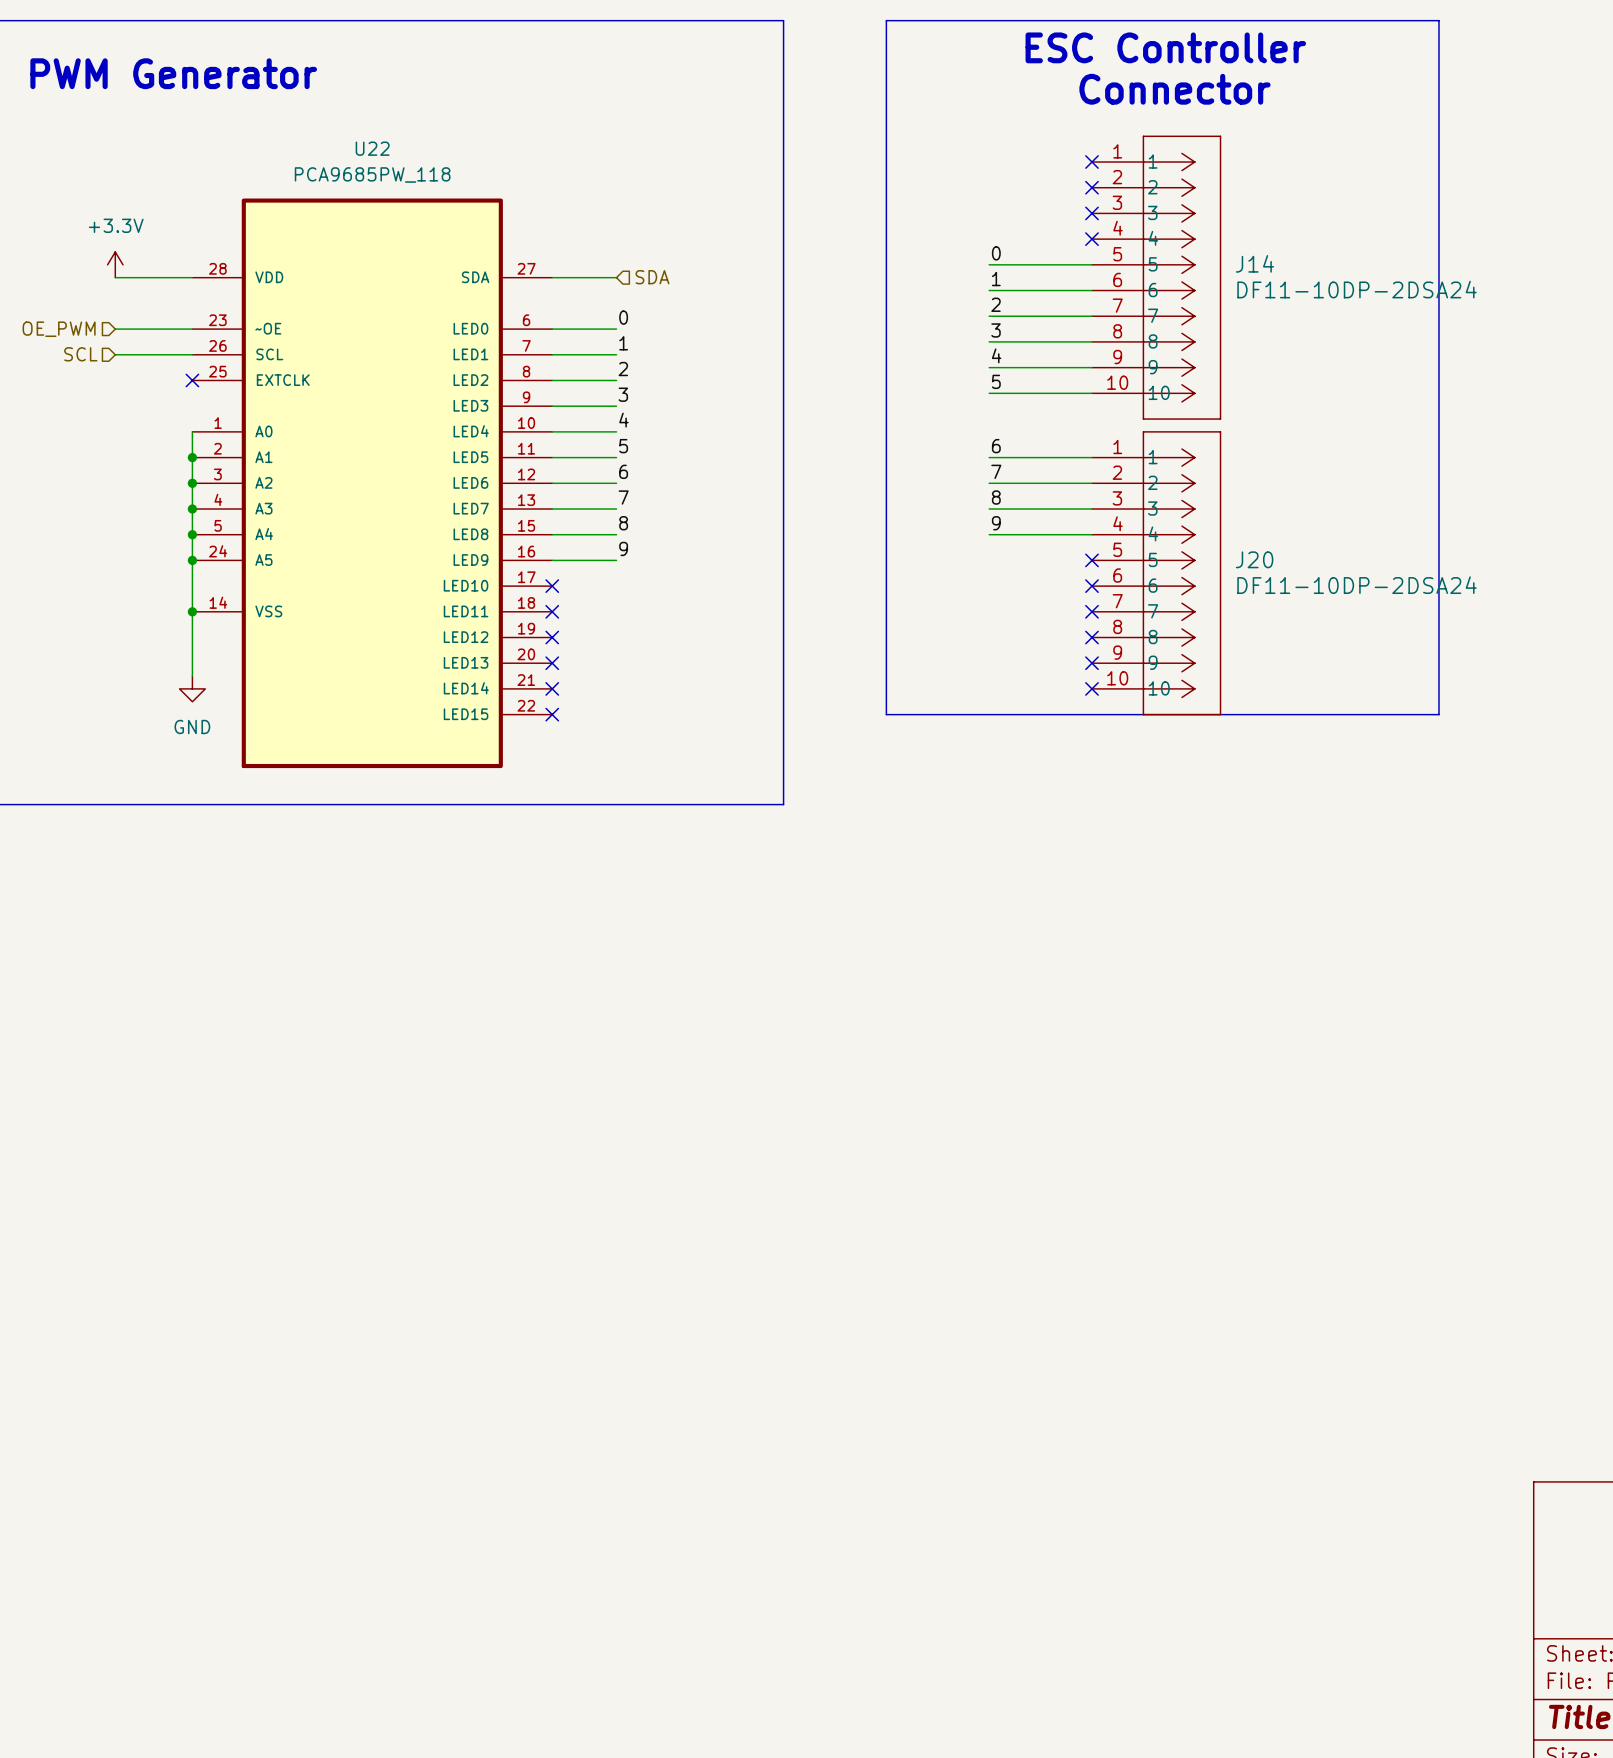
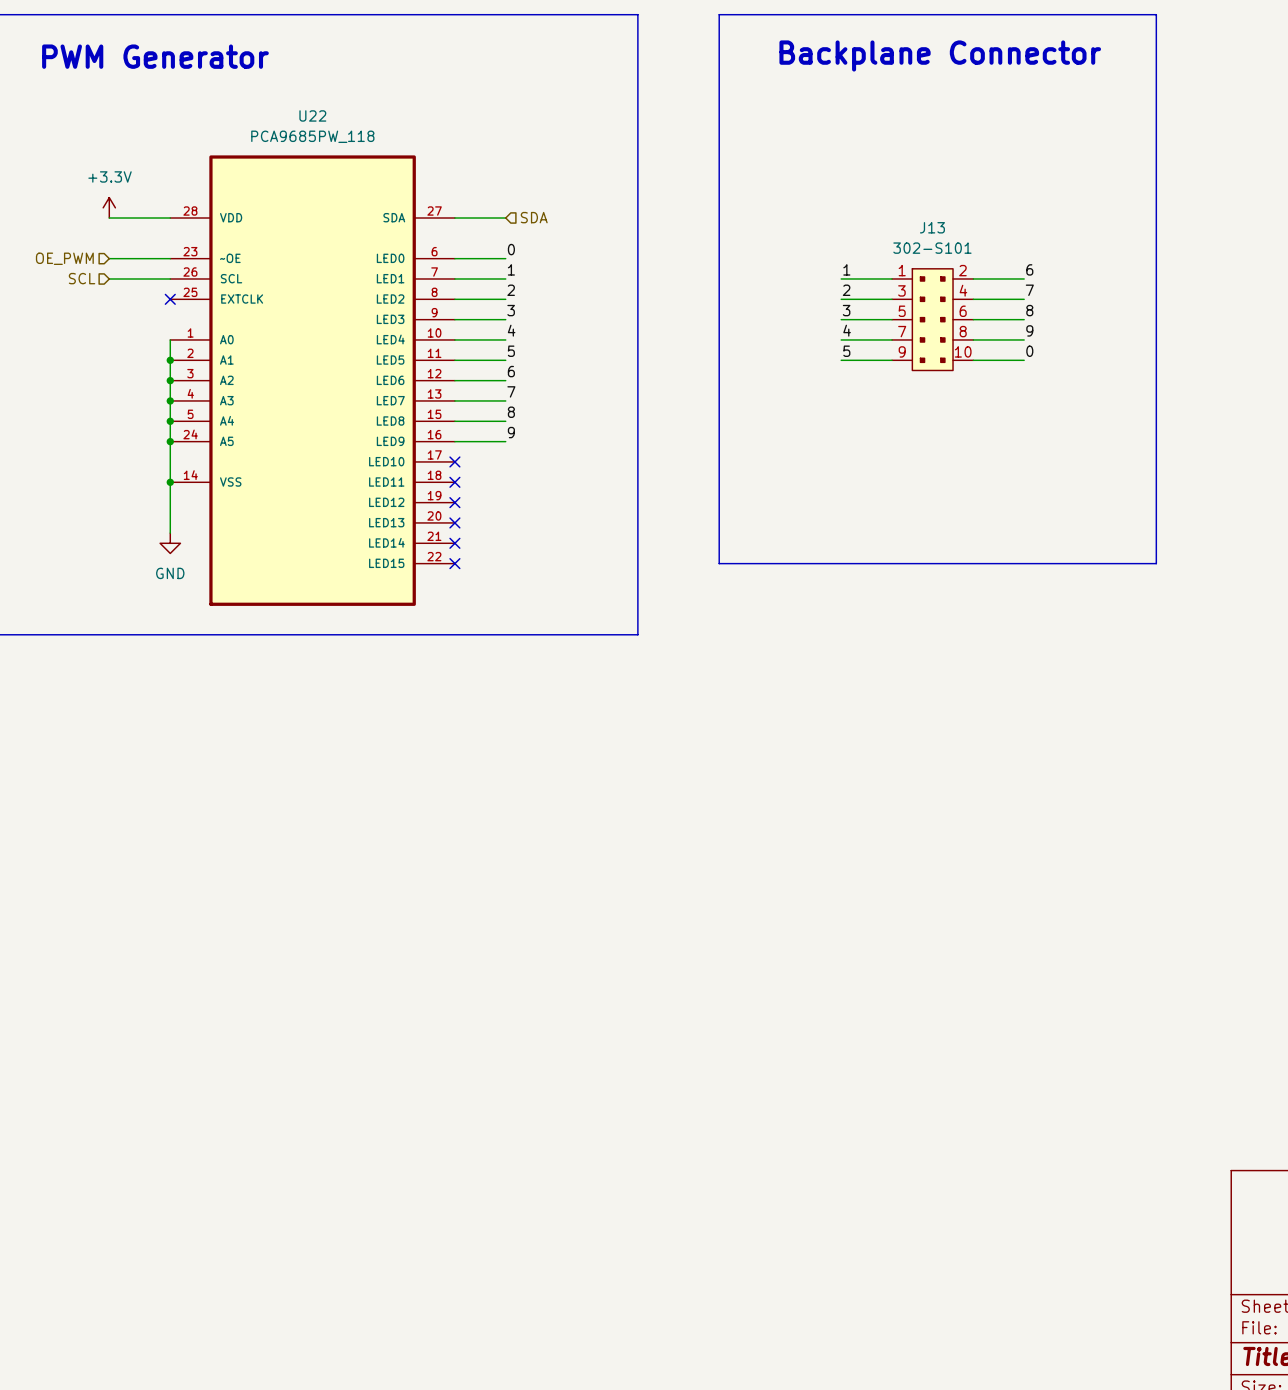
text: ESC Controller (1165, 47) -> none
text: Connector (1174, 89) -> Backplane Connector (940, 55)
no-connect mark: (1092, 162) -> none
no-connect mark: (1092, 187) -> none
no-connect mark: (1092, 213) -> none
no-connect mark: (1092, 239) -> none
label: 0 (996, 253) -> none
wire: (989, 264) (1092, 264) -> none
J14: DF11-10DP-2DSA24 (1156, 277) -> none
label position: 1 (996, 279) -> 1 (846, 269)
wire: (989, 290) (1092, 290) -> none
label position: 2 (996, 304) -> 2 (846, 290)
wire: (989, 316) (1092, 316) -> none
label position: 3 (996, 330) -> 3 (846, 310)
wire: (989, 341) (1092, 341) -> none
label: none -> 6 (1029, 269)
wire: none -> (841, 278) (892, 278)
wire: none -> (973, 278) (1024, 278)
label position: 4 (996, 355) -> 4 (847, 330)
wire: (989, 367) (1092, 367) -> none
label: none -> 7 (1029, 290)
wire: none -> (841, 299) (892, 299)
wire: none -> (973, 299) (1024, 299)
label position: 5 (996, 381) -> 5 (846, 351)
wire: (989, 393) (1092, 393) -> none
label: none -> 8 (1029, 310)
wire: none -> (841, 319) (892, 319)
J13: none -> 302-S101 (932, 319)
wire: none -> (973, 319) (1024, 319)
label: none -> 9 (1029, 330)
wire: none -> (841, 339) (892, 339)
wire: none -> (973, 339) (1024, 339)
label: 6 (996, 446) -> none
label: none -> 0 (1029, 351)
wire: (989, 457) (1040, 457) -> none
wire: none -> (973, 360) (1024, 360)
label: 7 (996, 471) -> none
wire: (989, 483) (1092, 483) -> none
label: 8 (996, 497) -> none
wire: (989, 509) (1092, 509) -> none
label: 9 (996, 523) -> none
wire: (989, 534) (1092, 534) -> none
no-connect mark: (1092, 560) -> none
J20: DF11-10DP-2DSA24 (1156, 573) -> none
no-connect mark: (1092, 586) -> none
no-connect mark: (1092, 611) -> none
no-connect mark: (1092, 637) -> none
no-connect mark: (1092, 663) -> none
no-connect mark: (1092, 688) -> none

